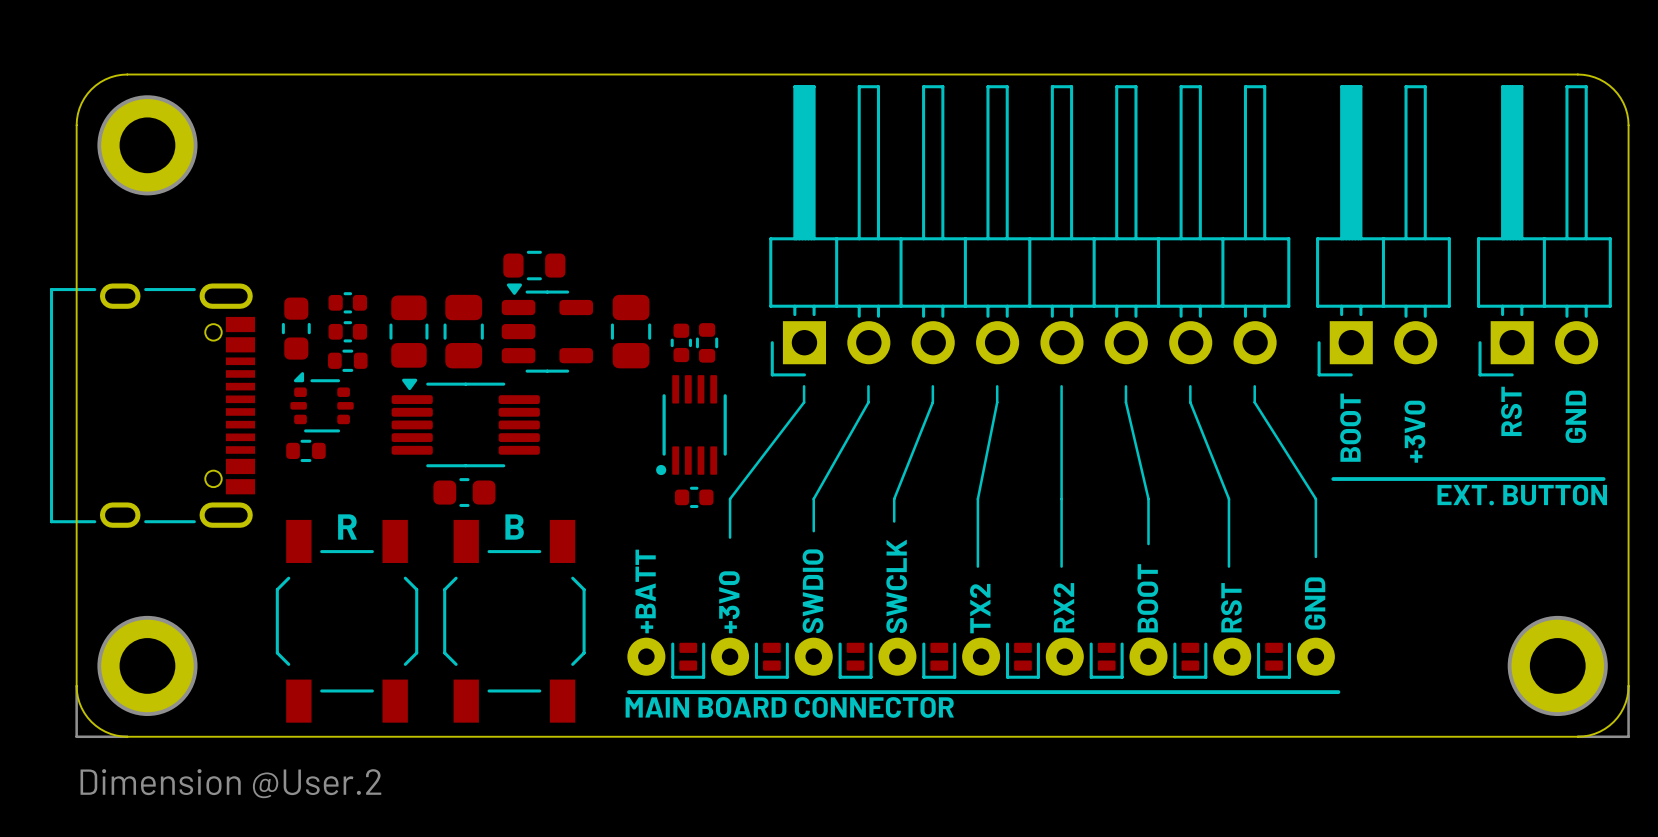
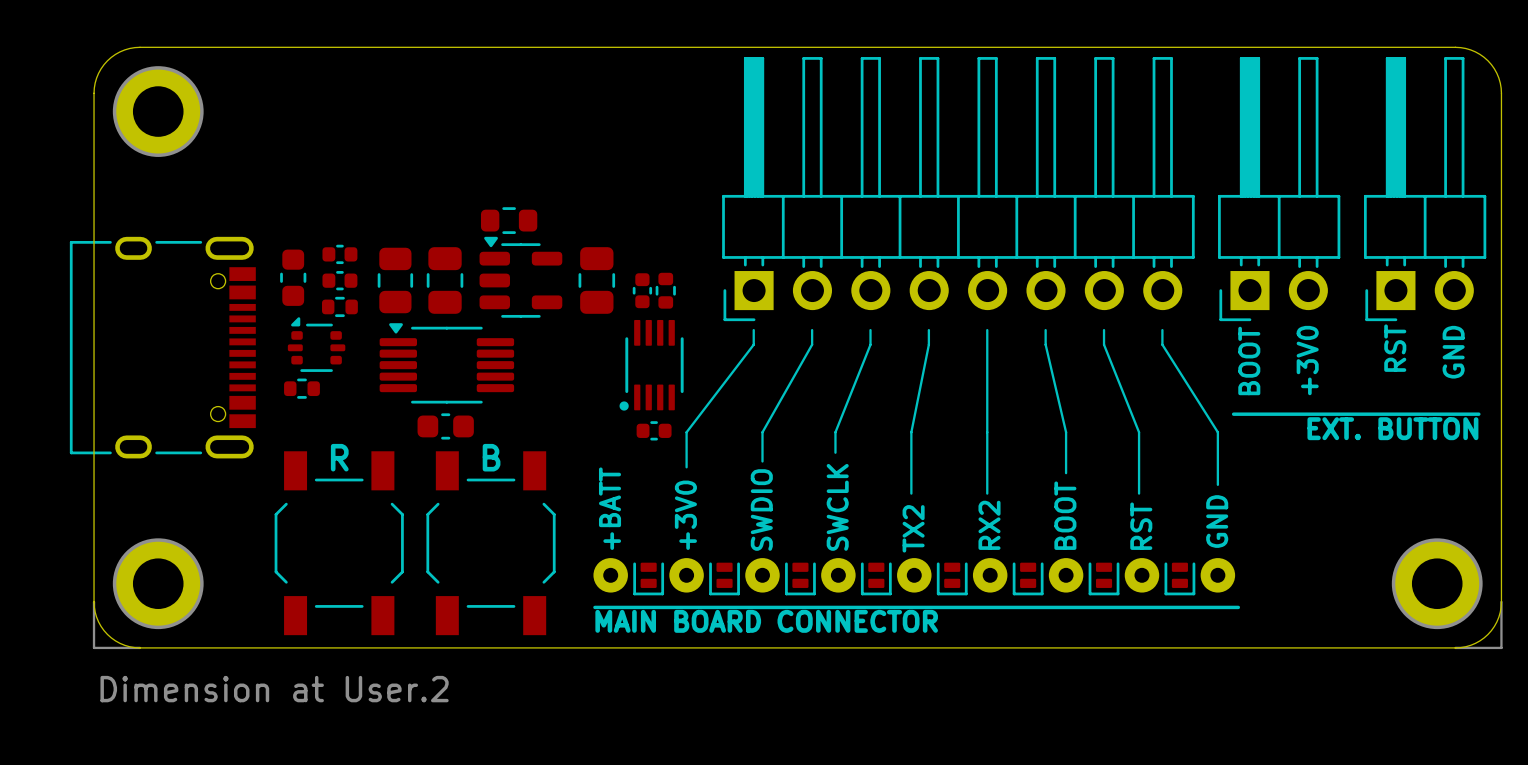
text: Dimension @User.2 (230, 783) -> Dimension at User.2 (274, 689)

